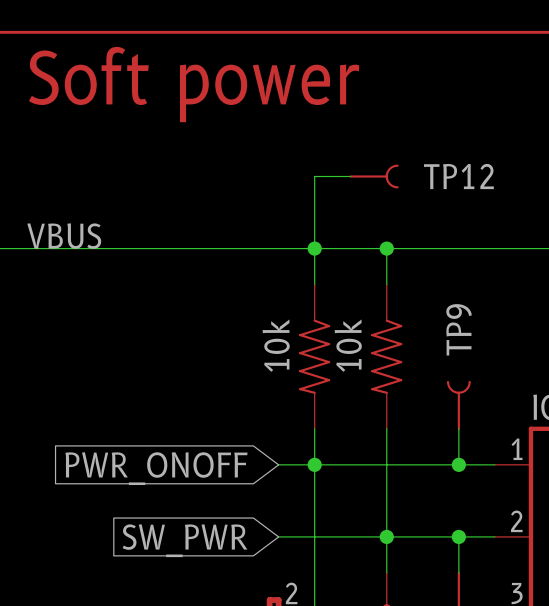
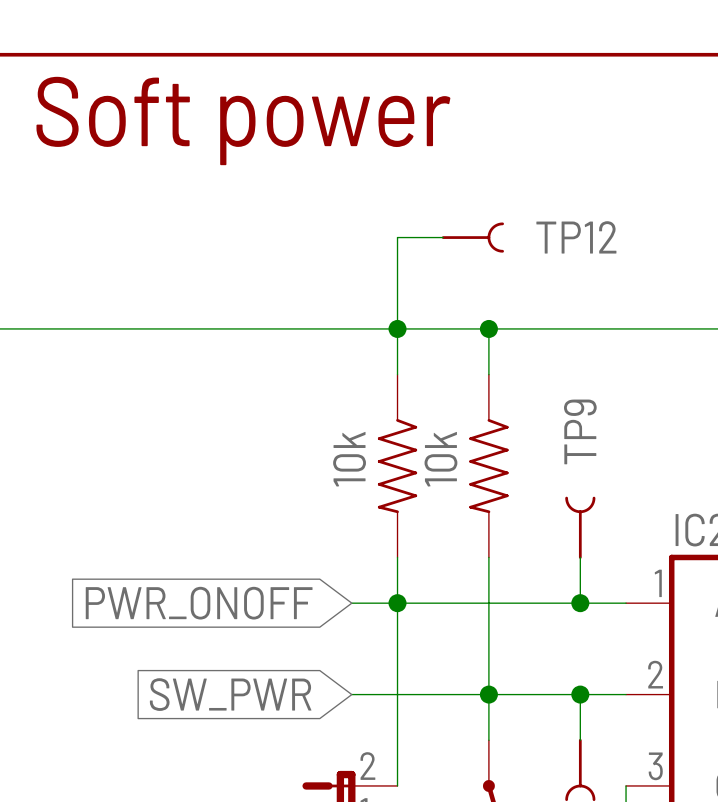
label: VBUS (64, 236) -> none

